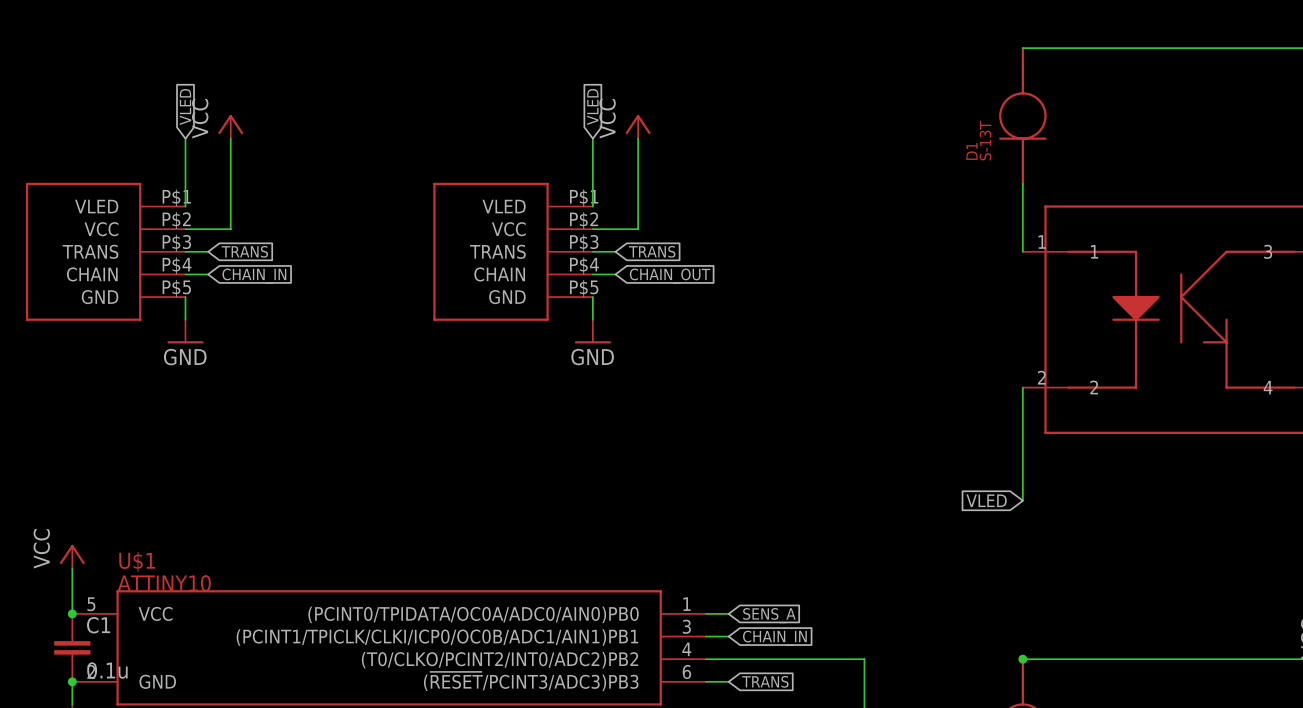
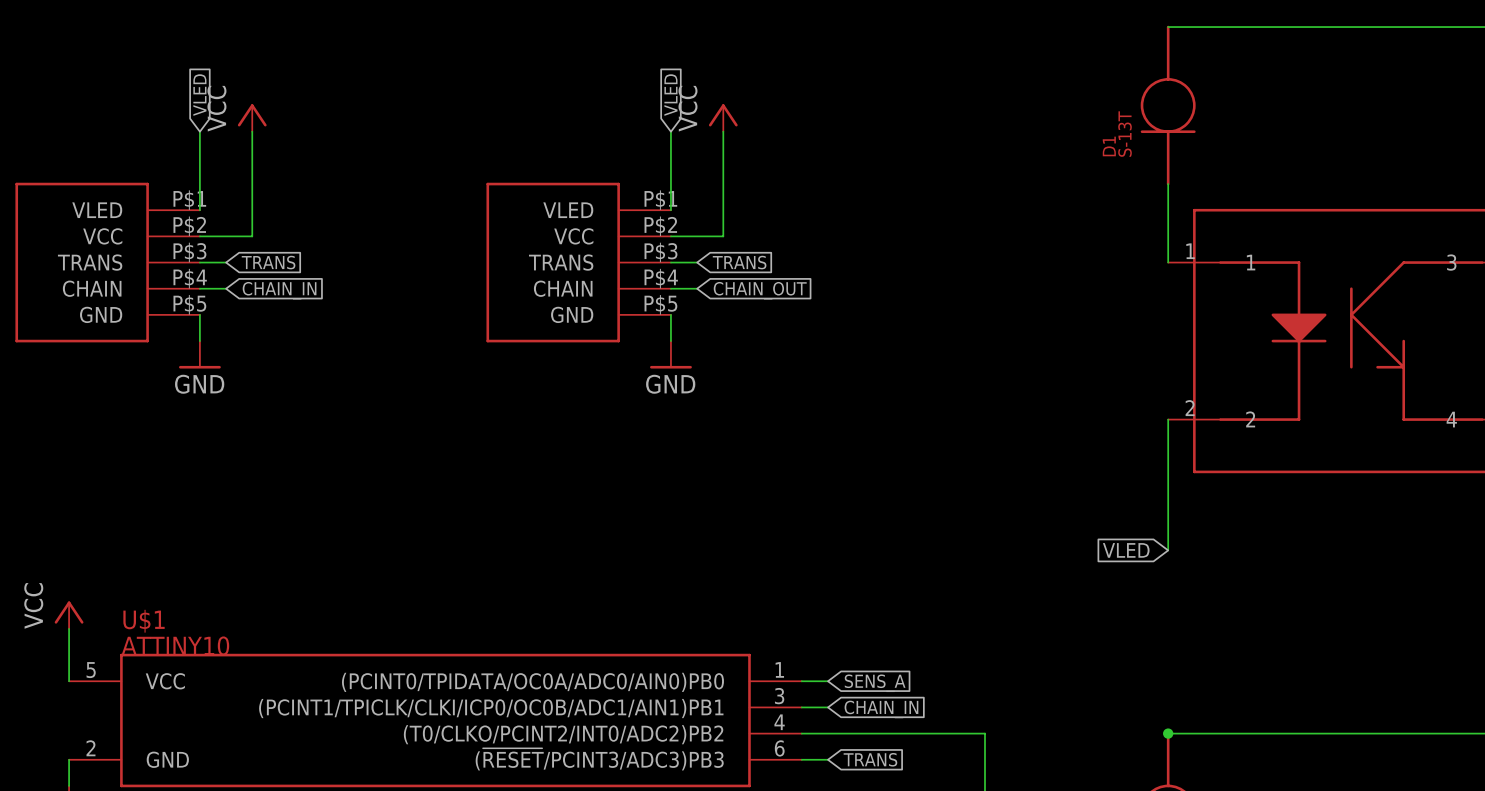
junction: (72, 613) -> none
C1: 0.1u (72, 647) -> none
junction: (72, 681) -> none

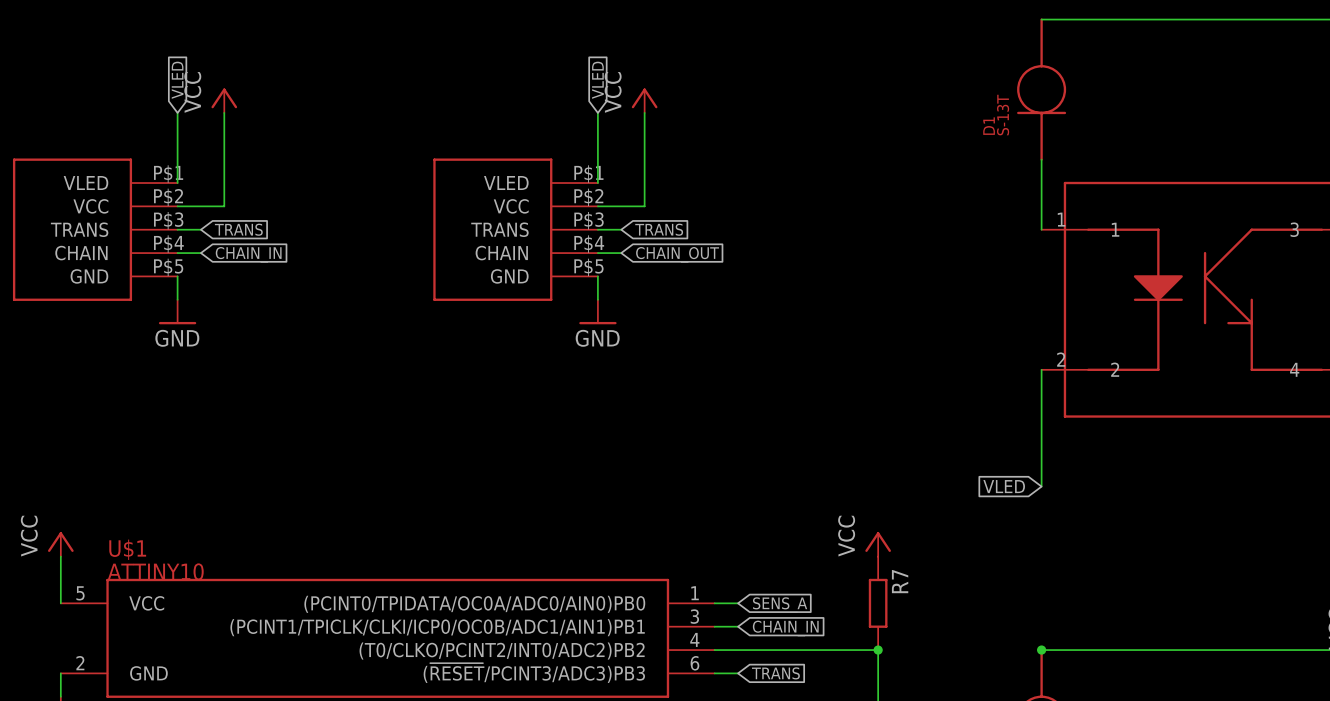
power symbol: none -> VCC (878, 544)
R7: none -> (878, 603)
junction: none -> (878, 650)

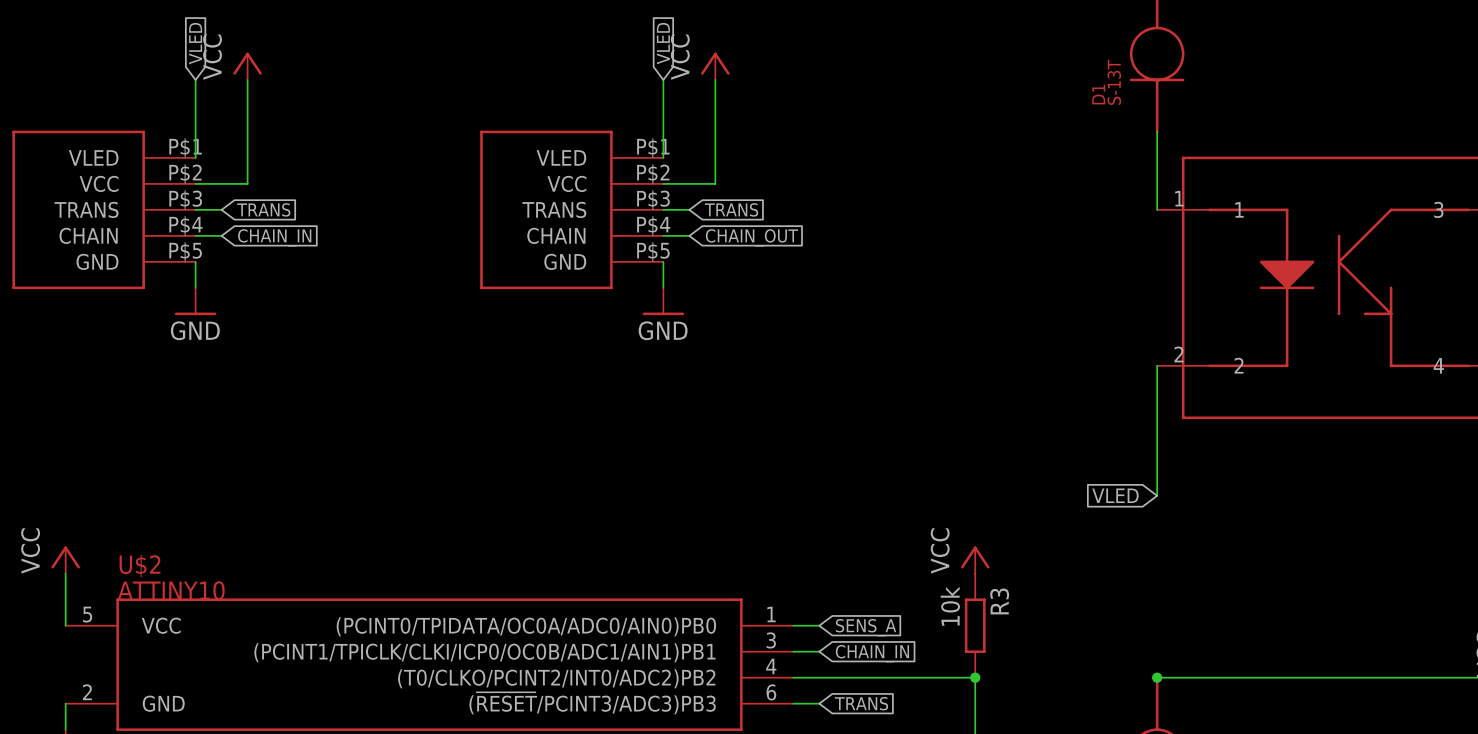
U$1 name: U$1 (127, 549) -> U$2 (140, 566)
R7 name: R7 (900, 581) -> R3 (999, 601)
R7 value: none -> 10k (950, 606)

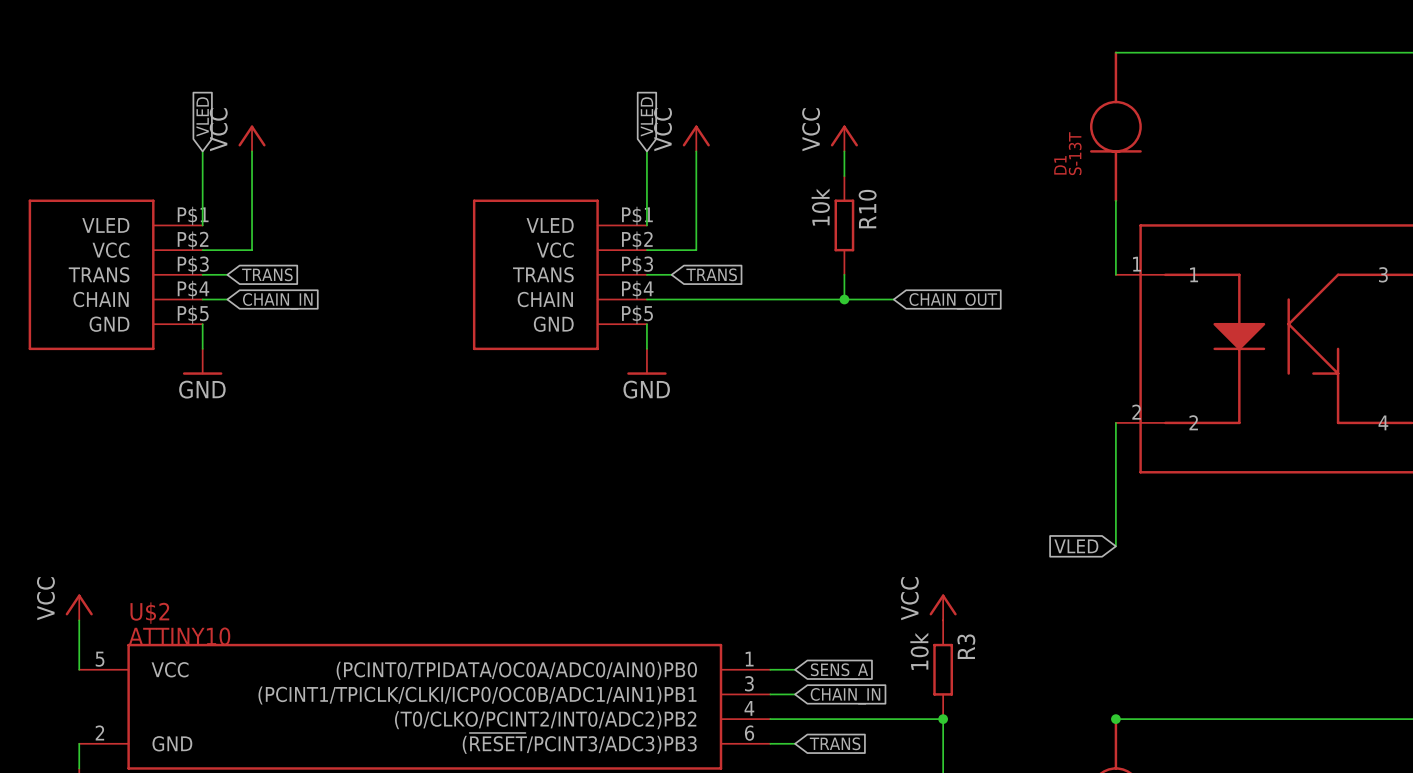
power symbol: none -> VCC (844, 138)
wire: none -> (844, 151) (844, 176)
R10: none -> 10k (844, 225)
wire: none -> (844, 274) (844, 299)
wire: none -> (671, 299) (893, 299)
junction: none -> (844, 299)
global label position: CHAIN_OUT (752, 237) -> CHAIN_OUT (953, 301)

